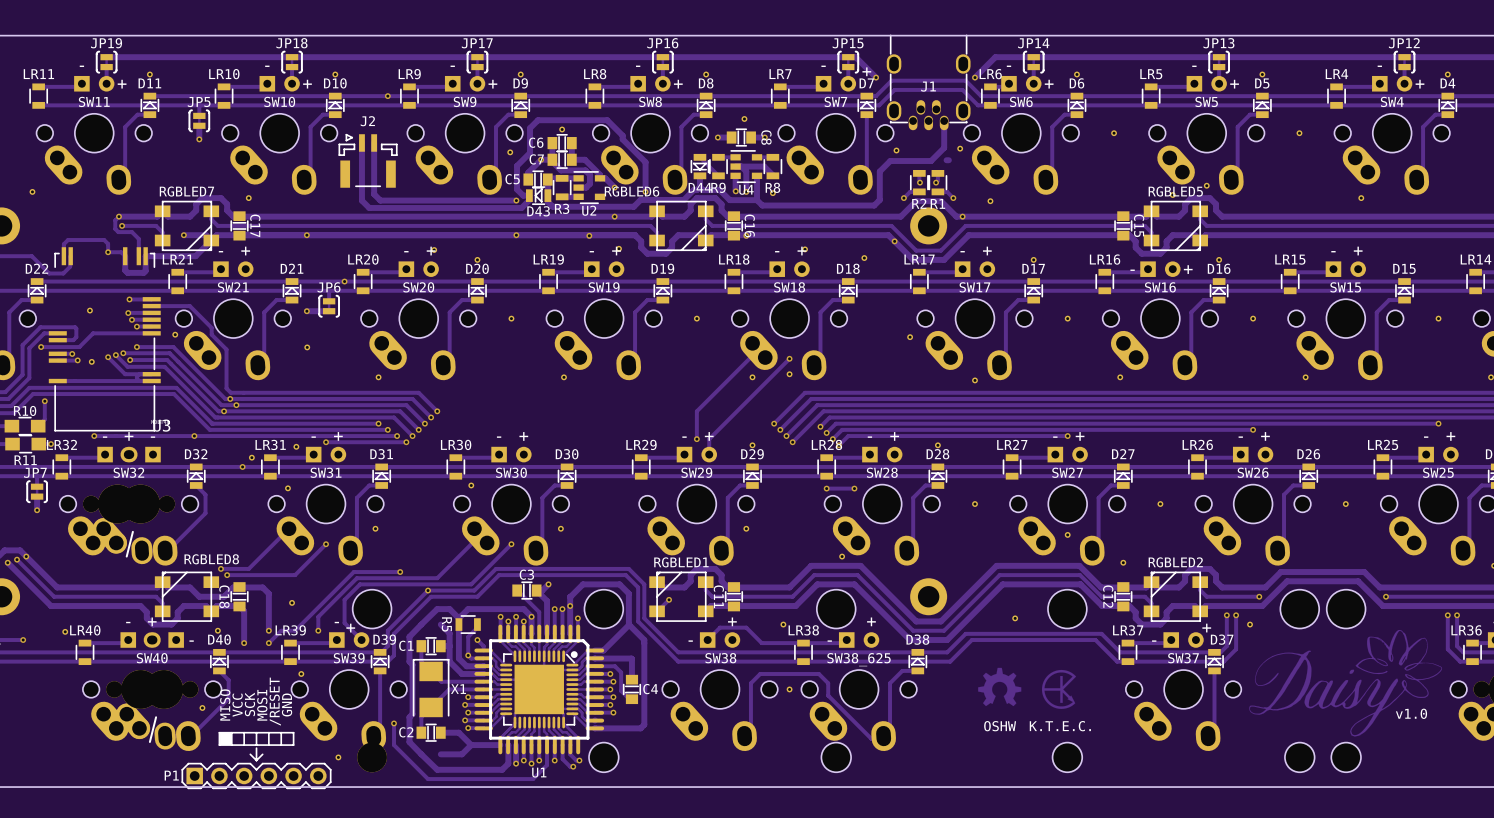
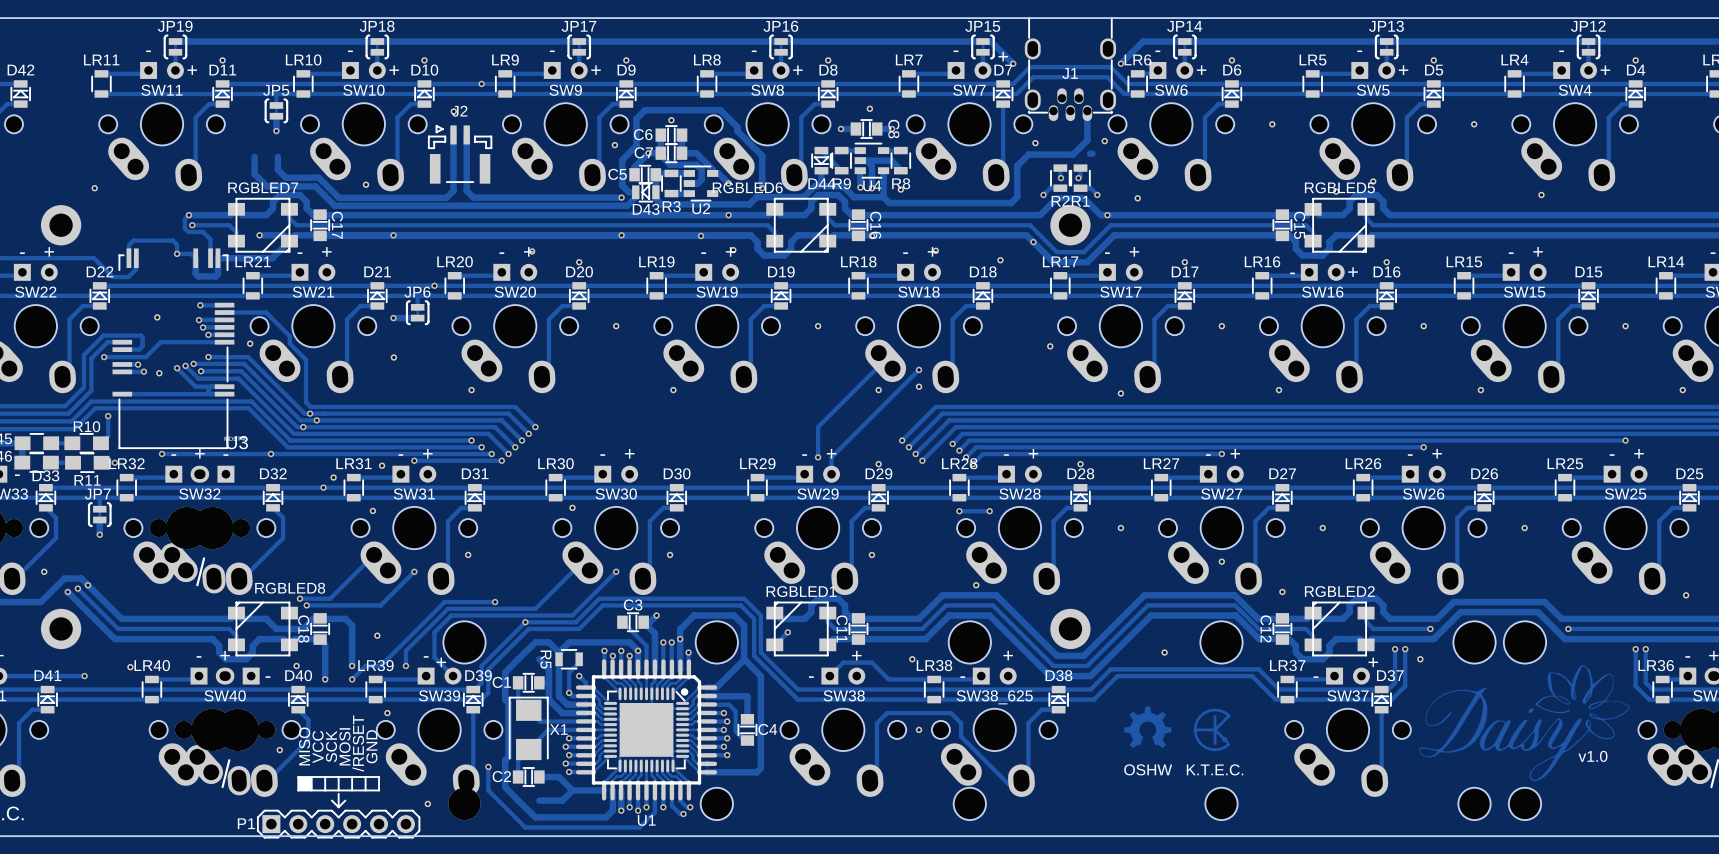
part: none -> (453, 111)
track: none -> (254, 156) (254, 174) (266, 186) (315, 186) (334, 205) (461, 205)
track: (361, 194) (361, 200) (369, 207) -> (453, 190) (446, 197) (338, 197) (318, 177) (285, 177) (277, 169) (277, 156)
part position: (248, 198) -> (366, 184)

